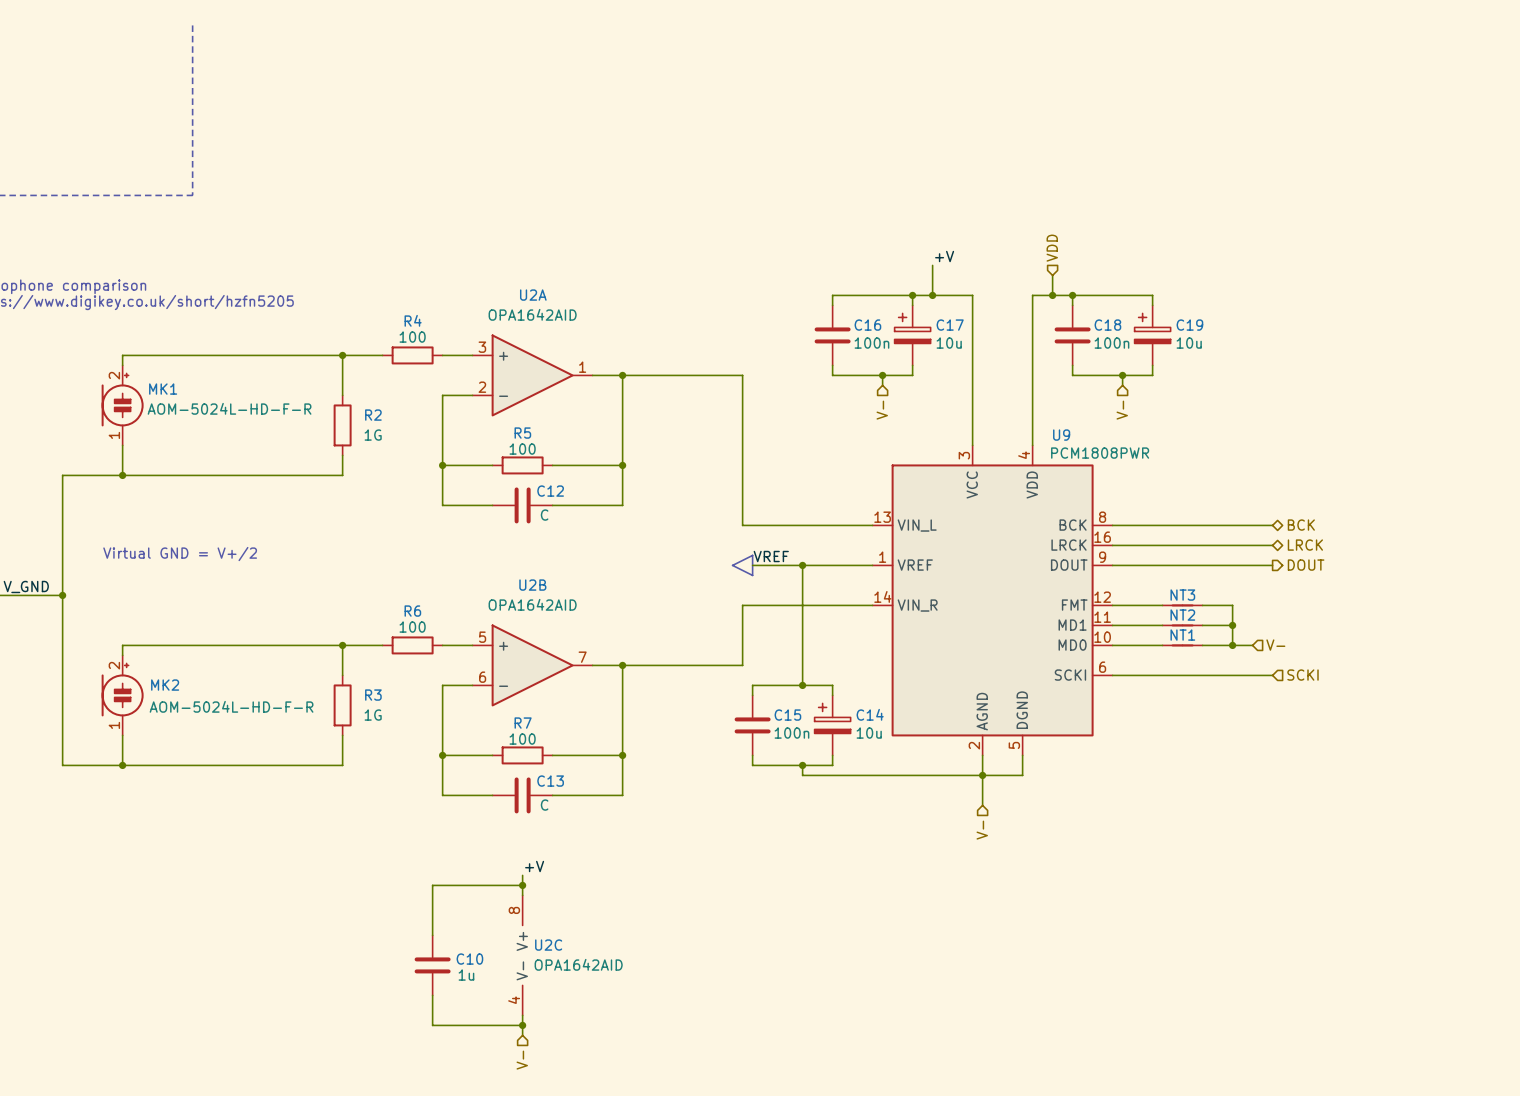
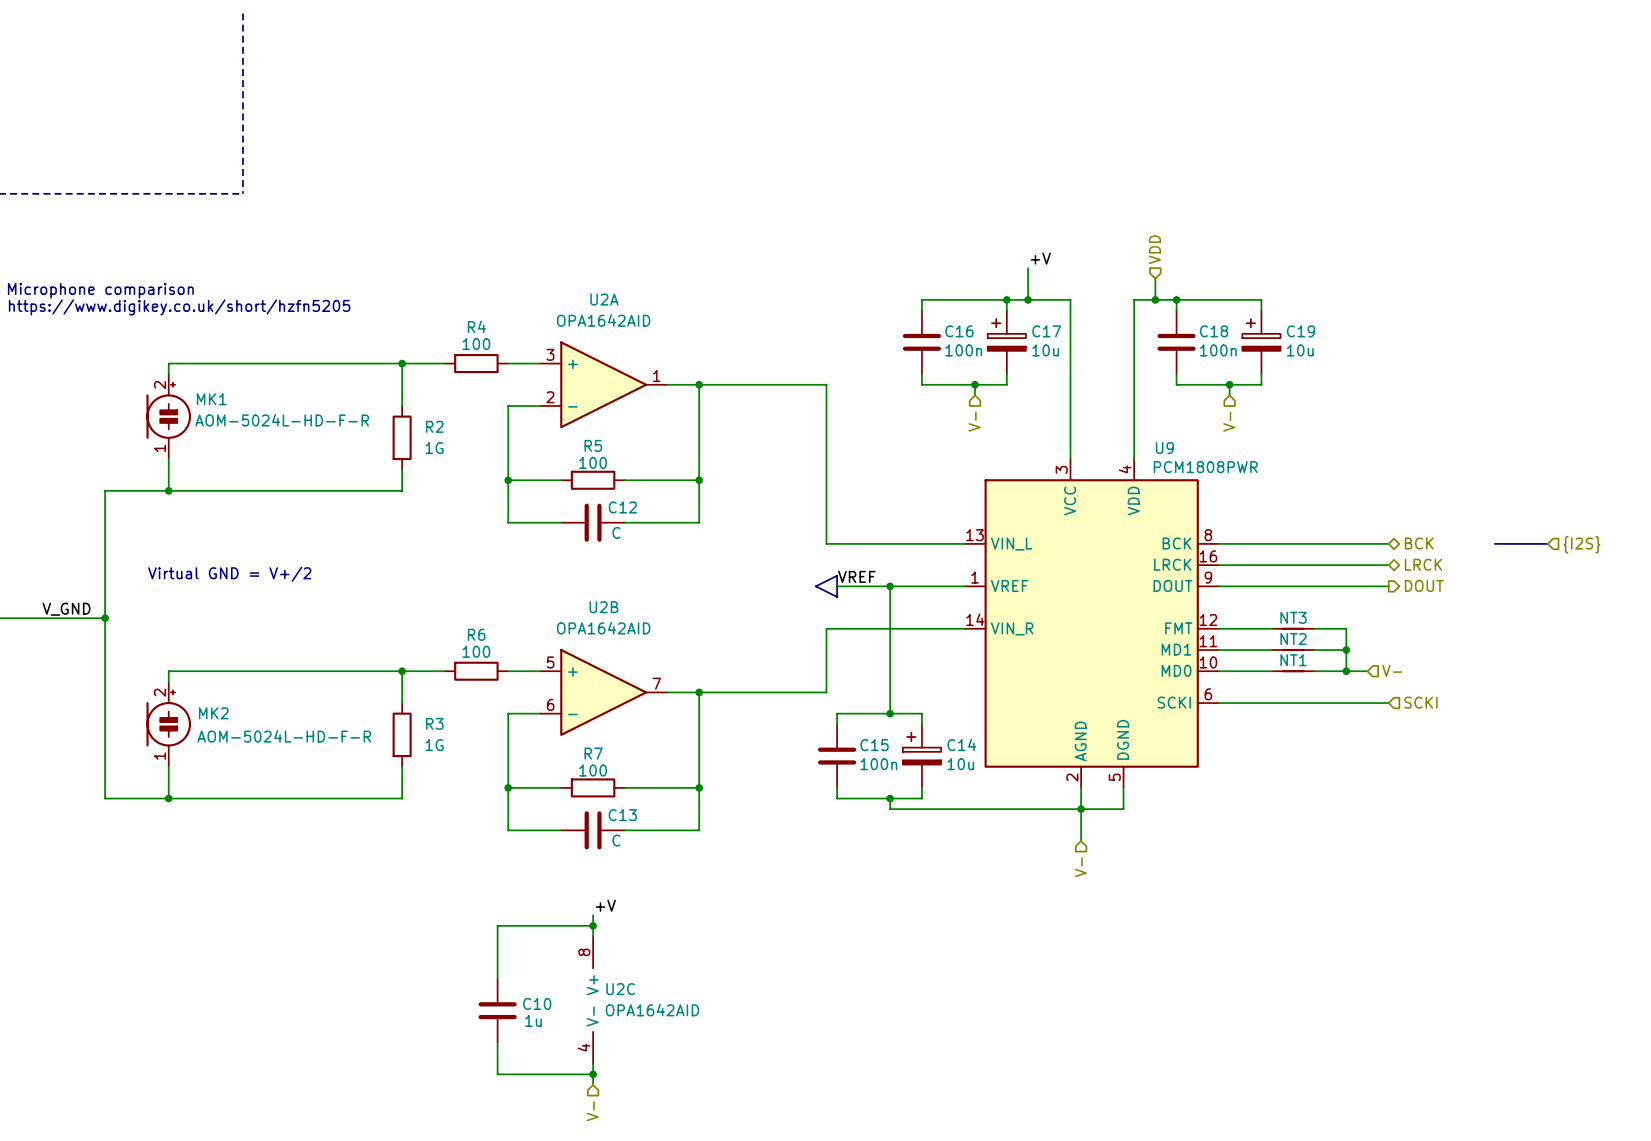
bus: none -> (1494, 543) (1547, 543)
hierarchical label: none -> {I2S} (1581, 544)

